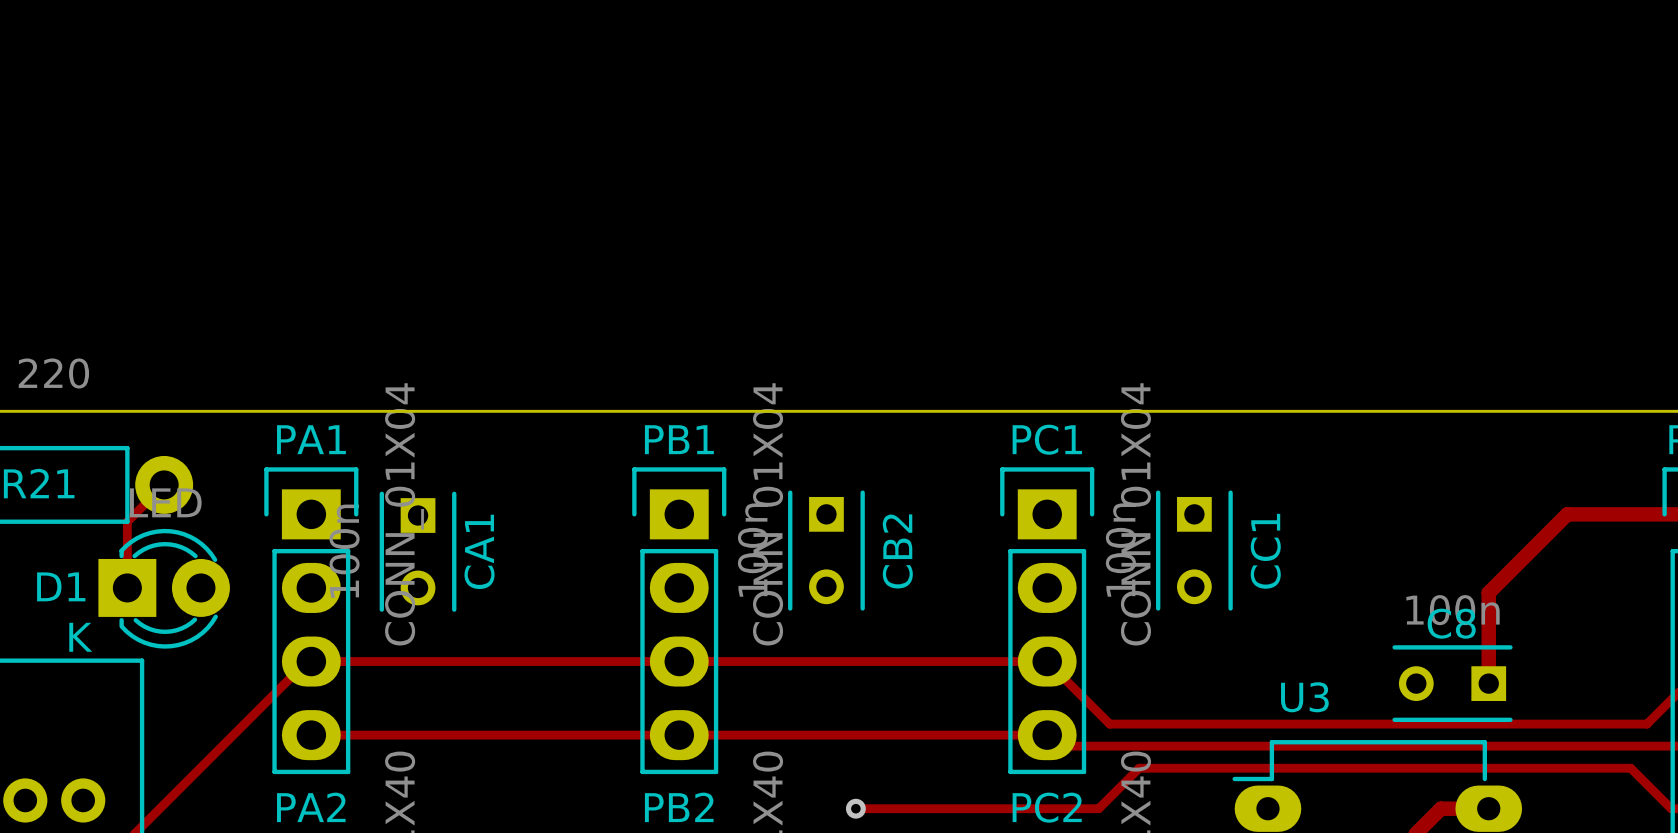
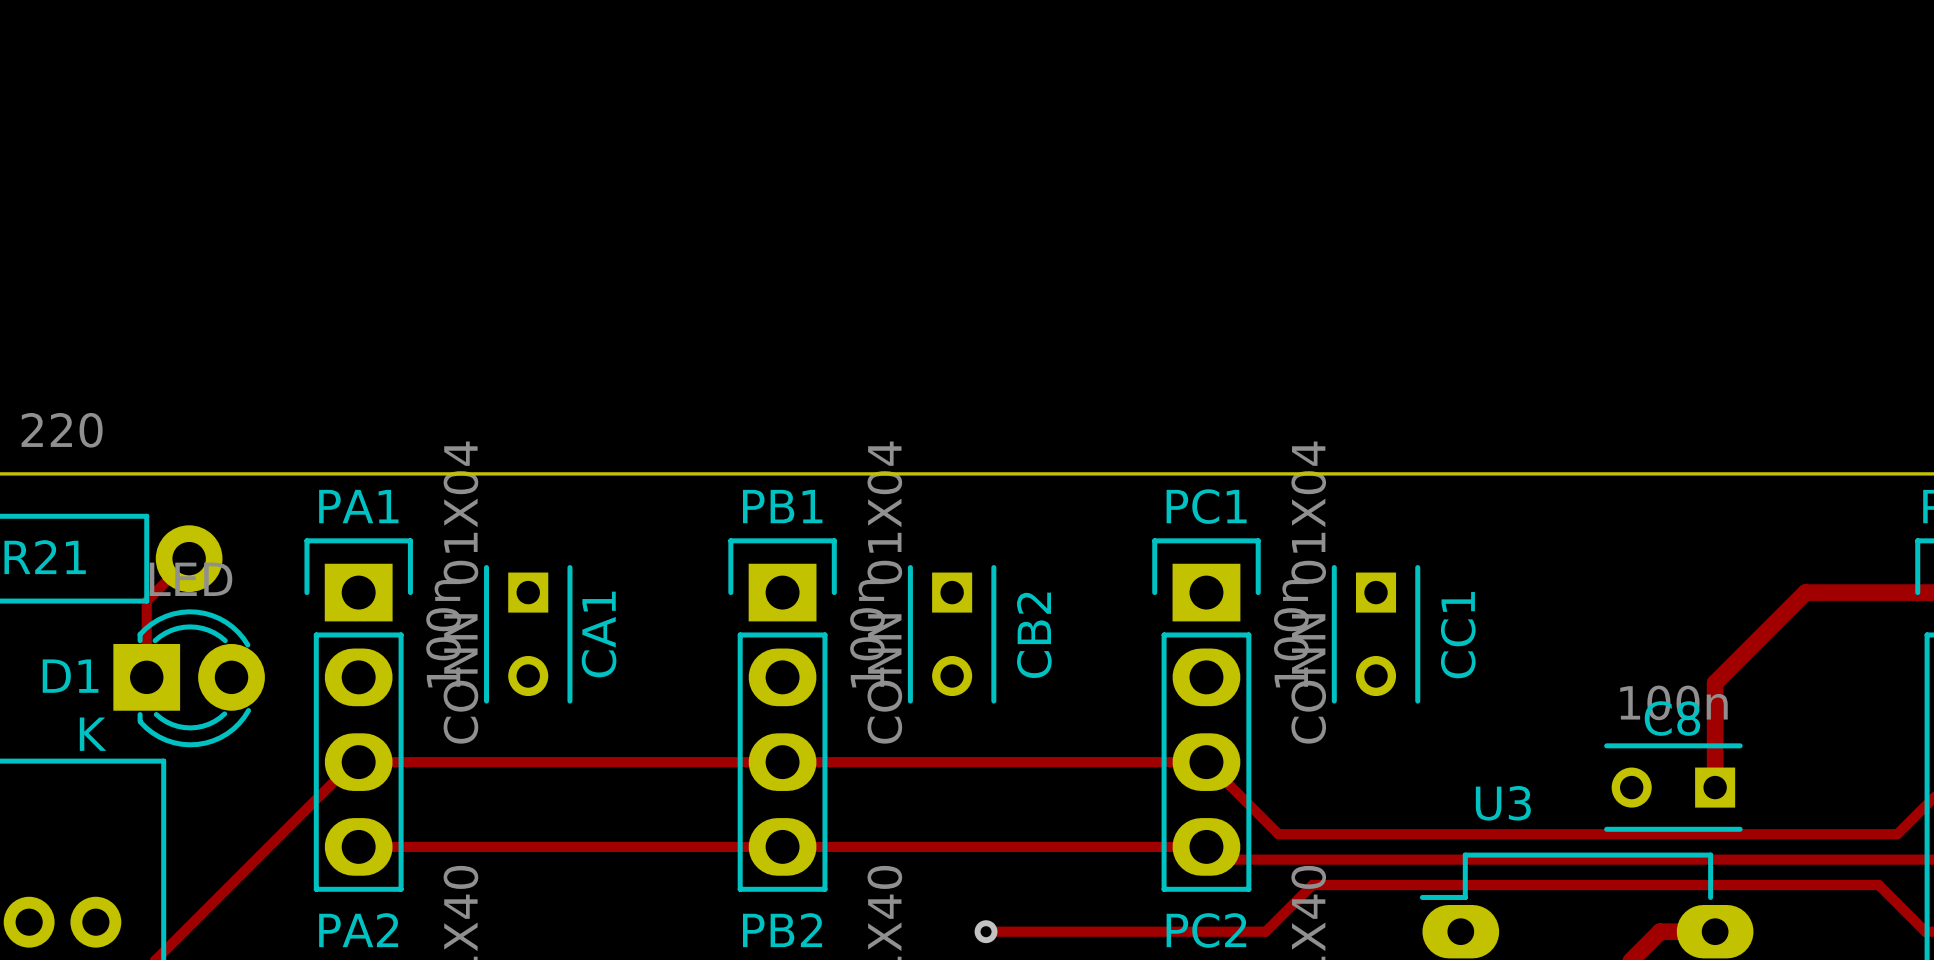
CA1 position: (418, 551) -> (528, 634)

